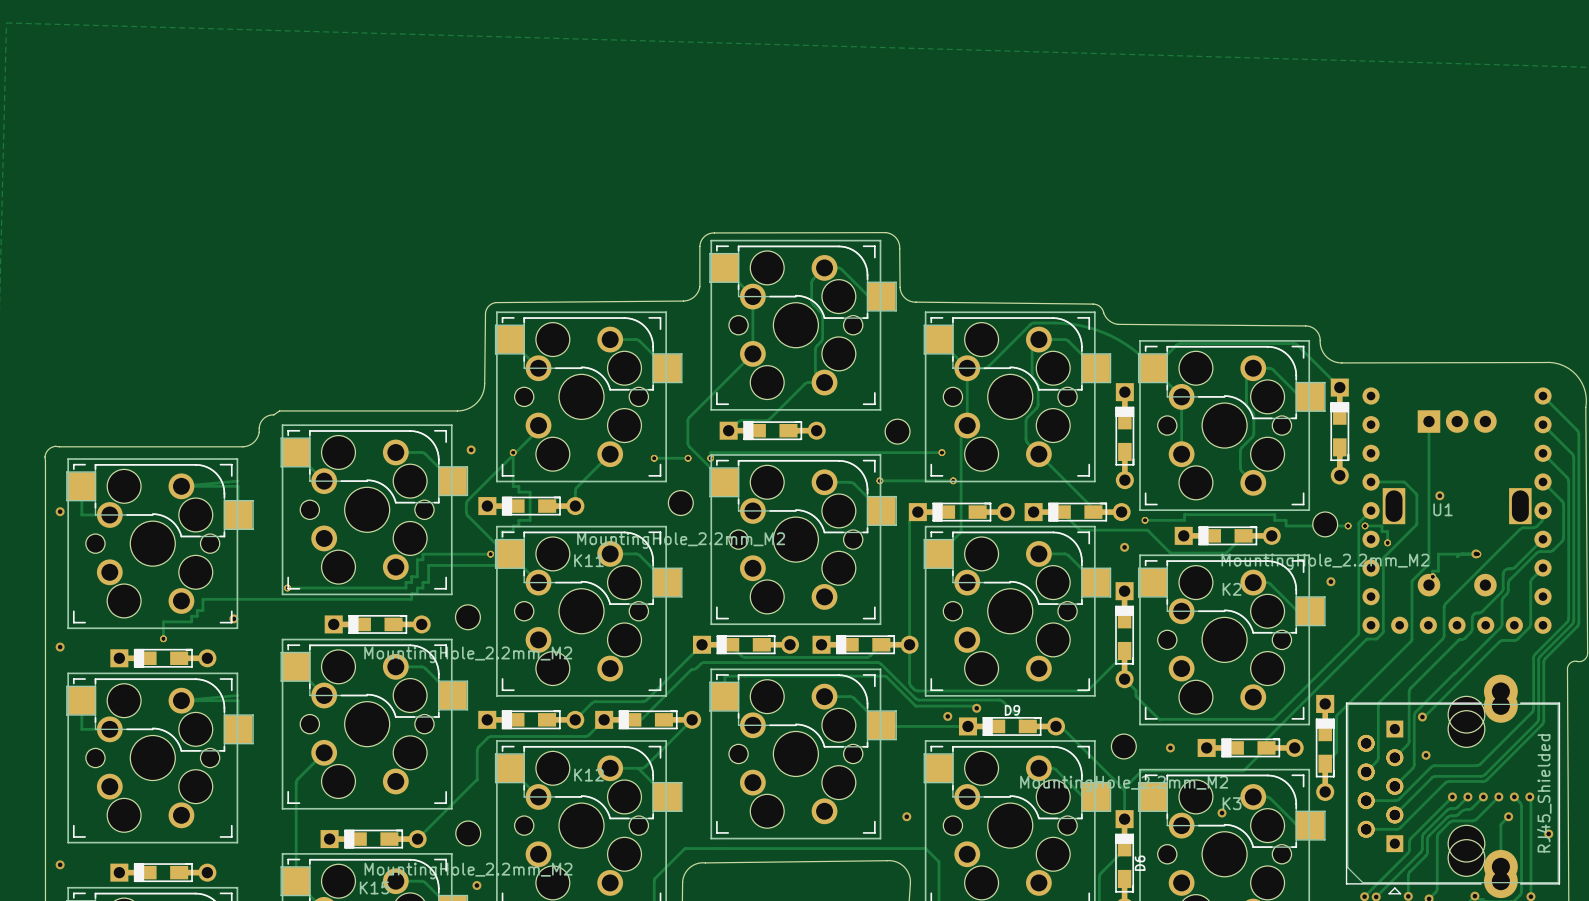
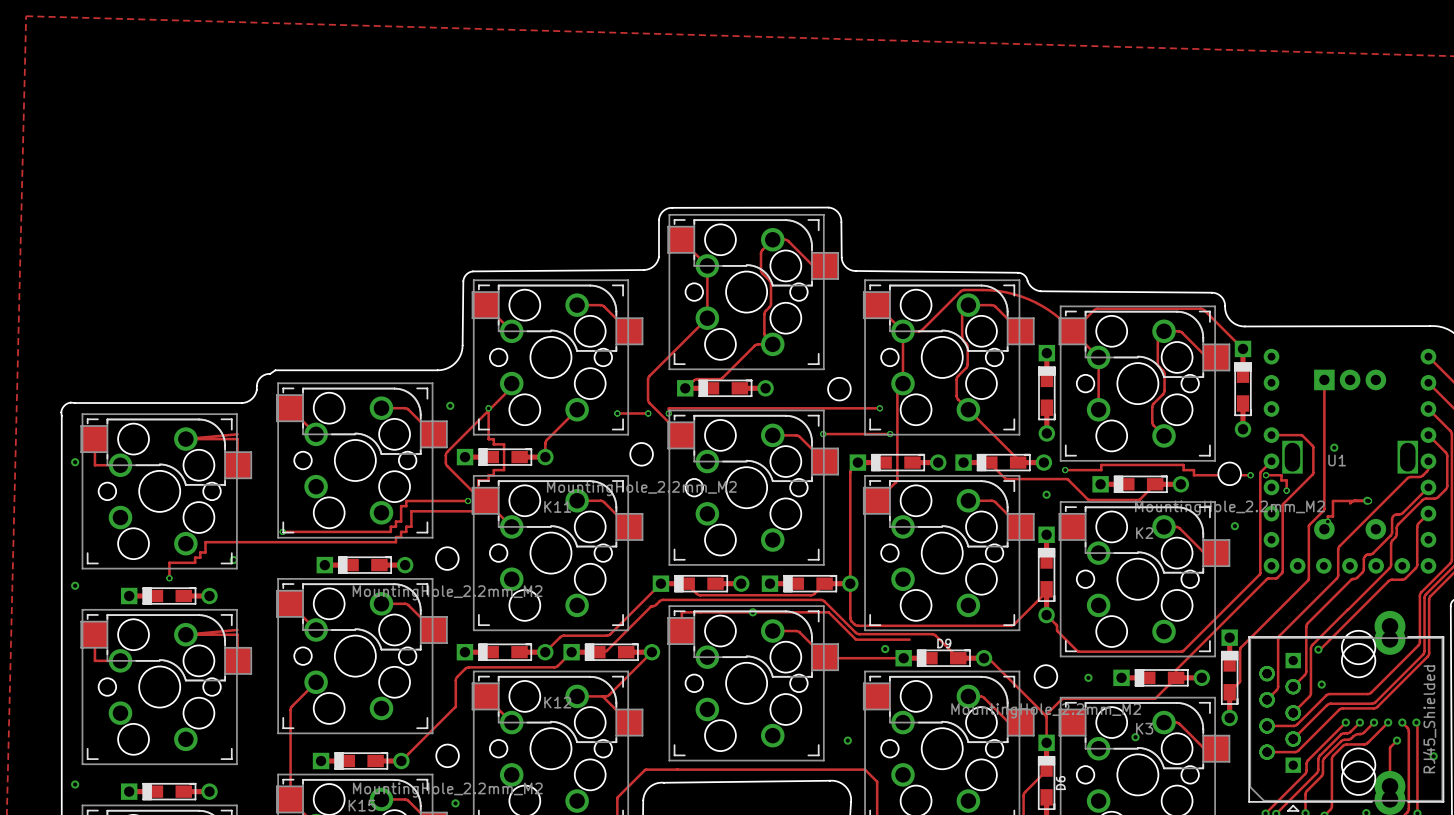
via: none -> (752, 612)
via: (976, 708) -> none

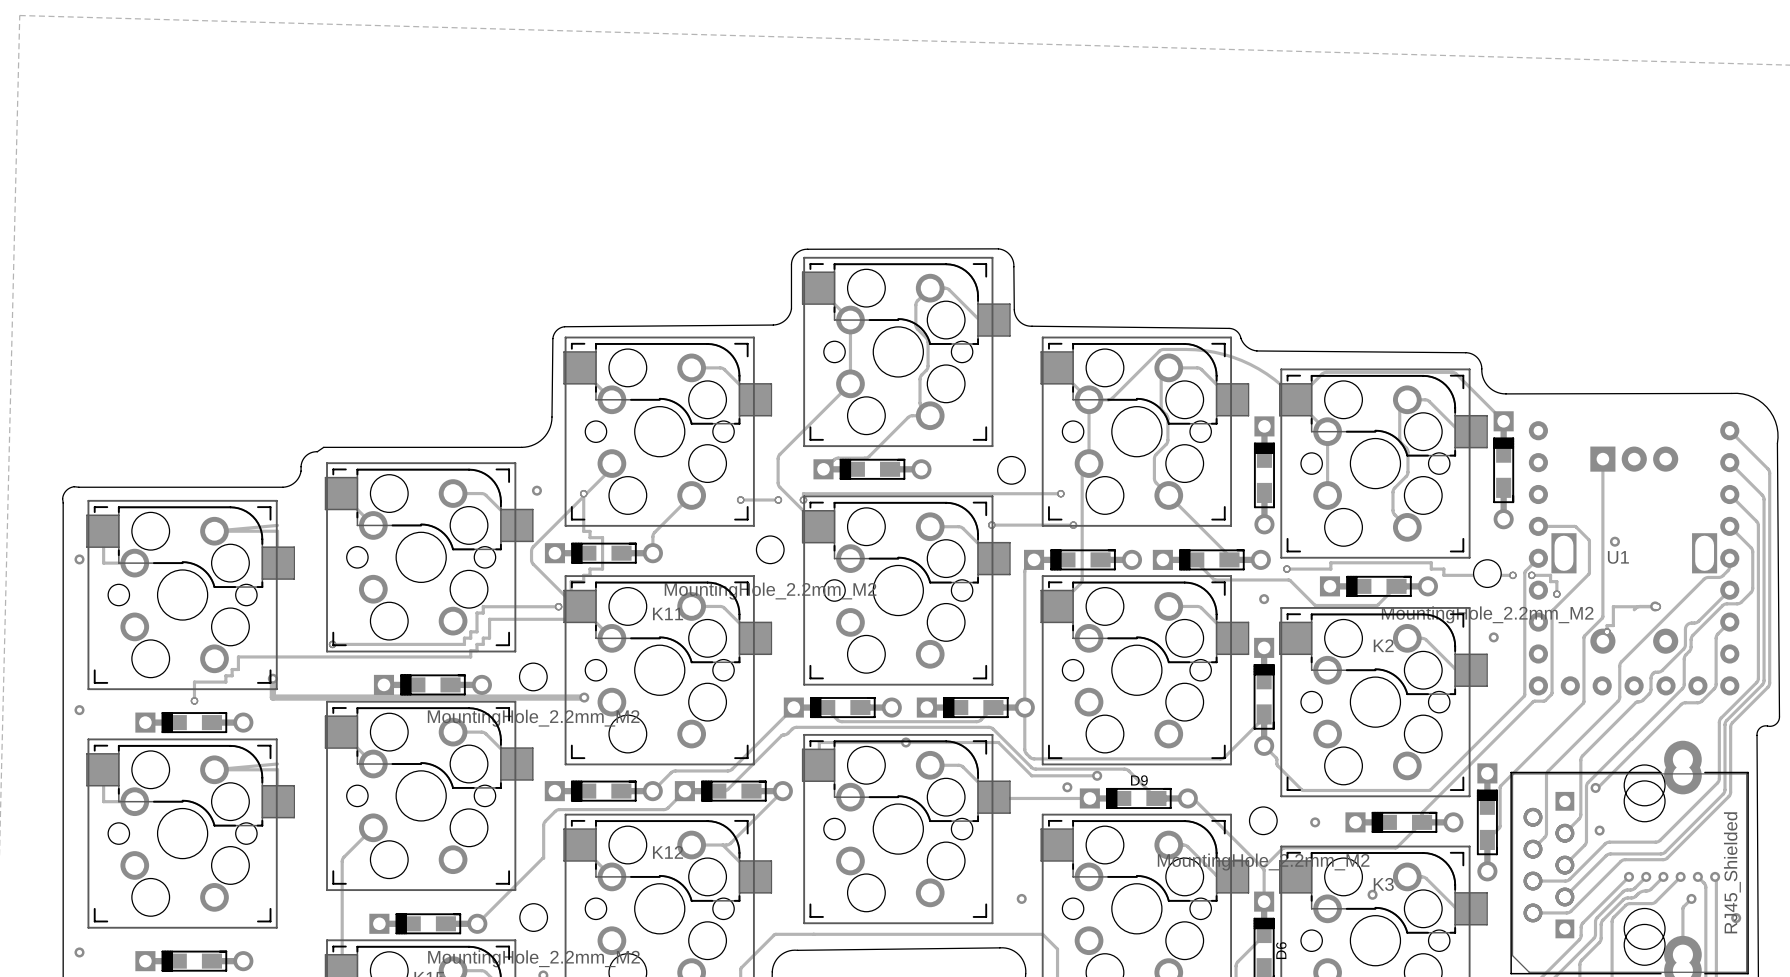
track: none -> (272, 678) (272, 697) (584, 697)
via: none -> (584, 697)
via: none -> (1097, 775)

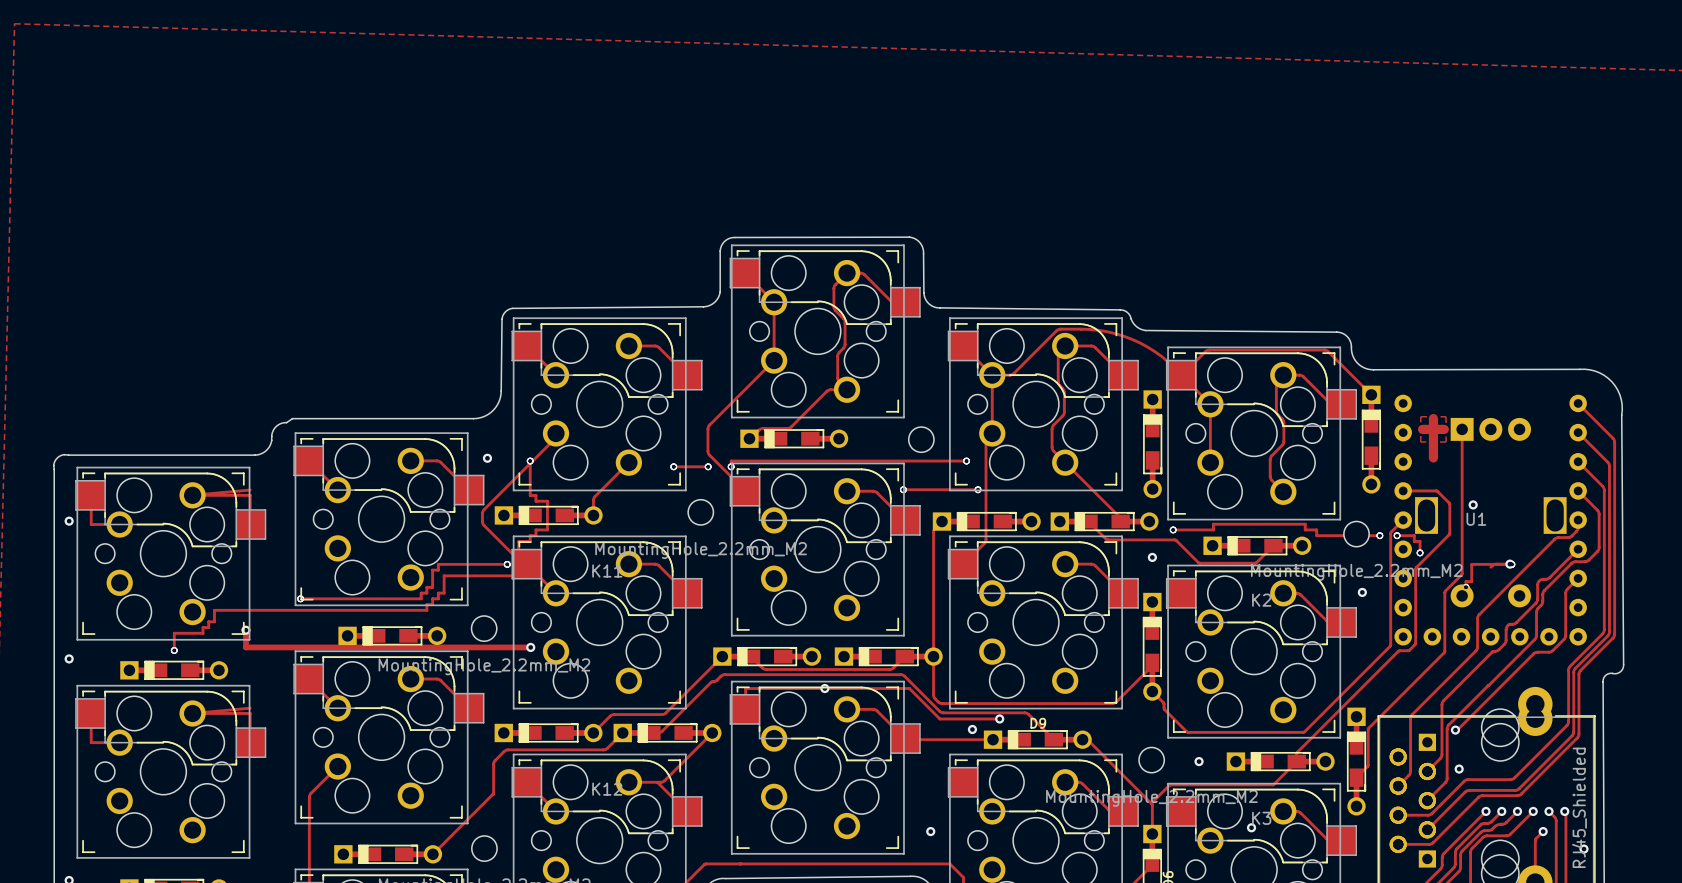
zone outline: none -> (1420, 416) (1446, 416) (1446, 442) (1420, 442) (1420, 416)
track: none -> (1433, 418) (1433, 457)
track: none -> (1422, 429) (1444, 429)

